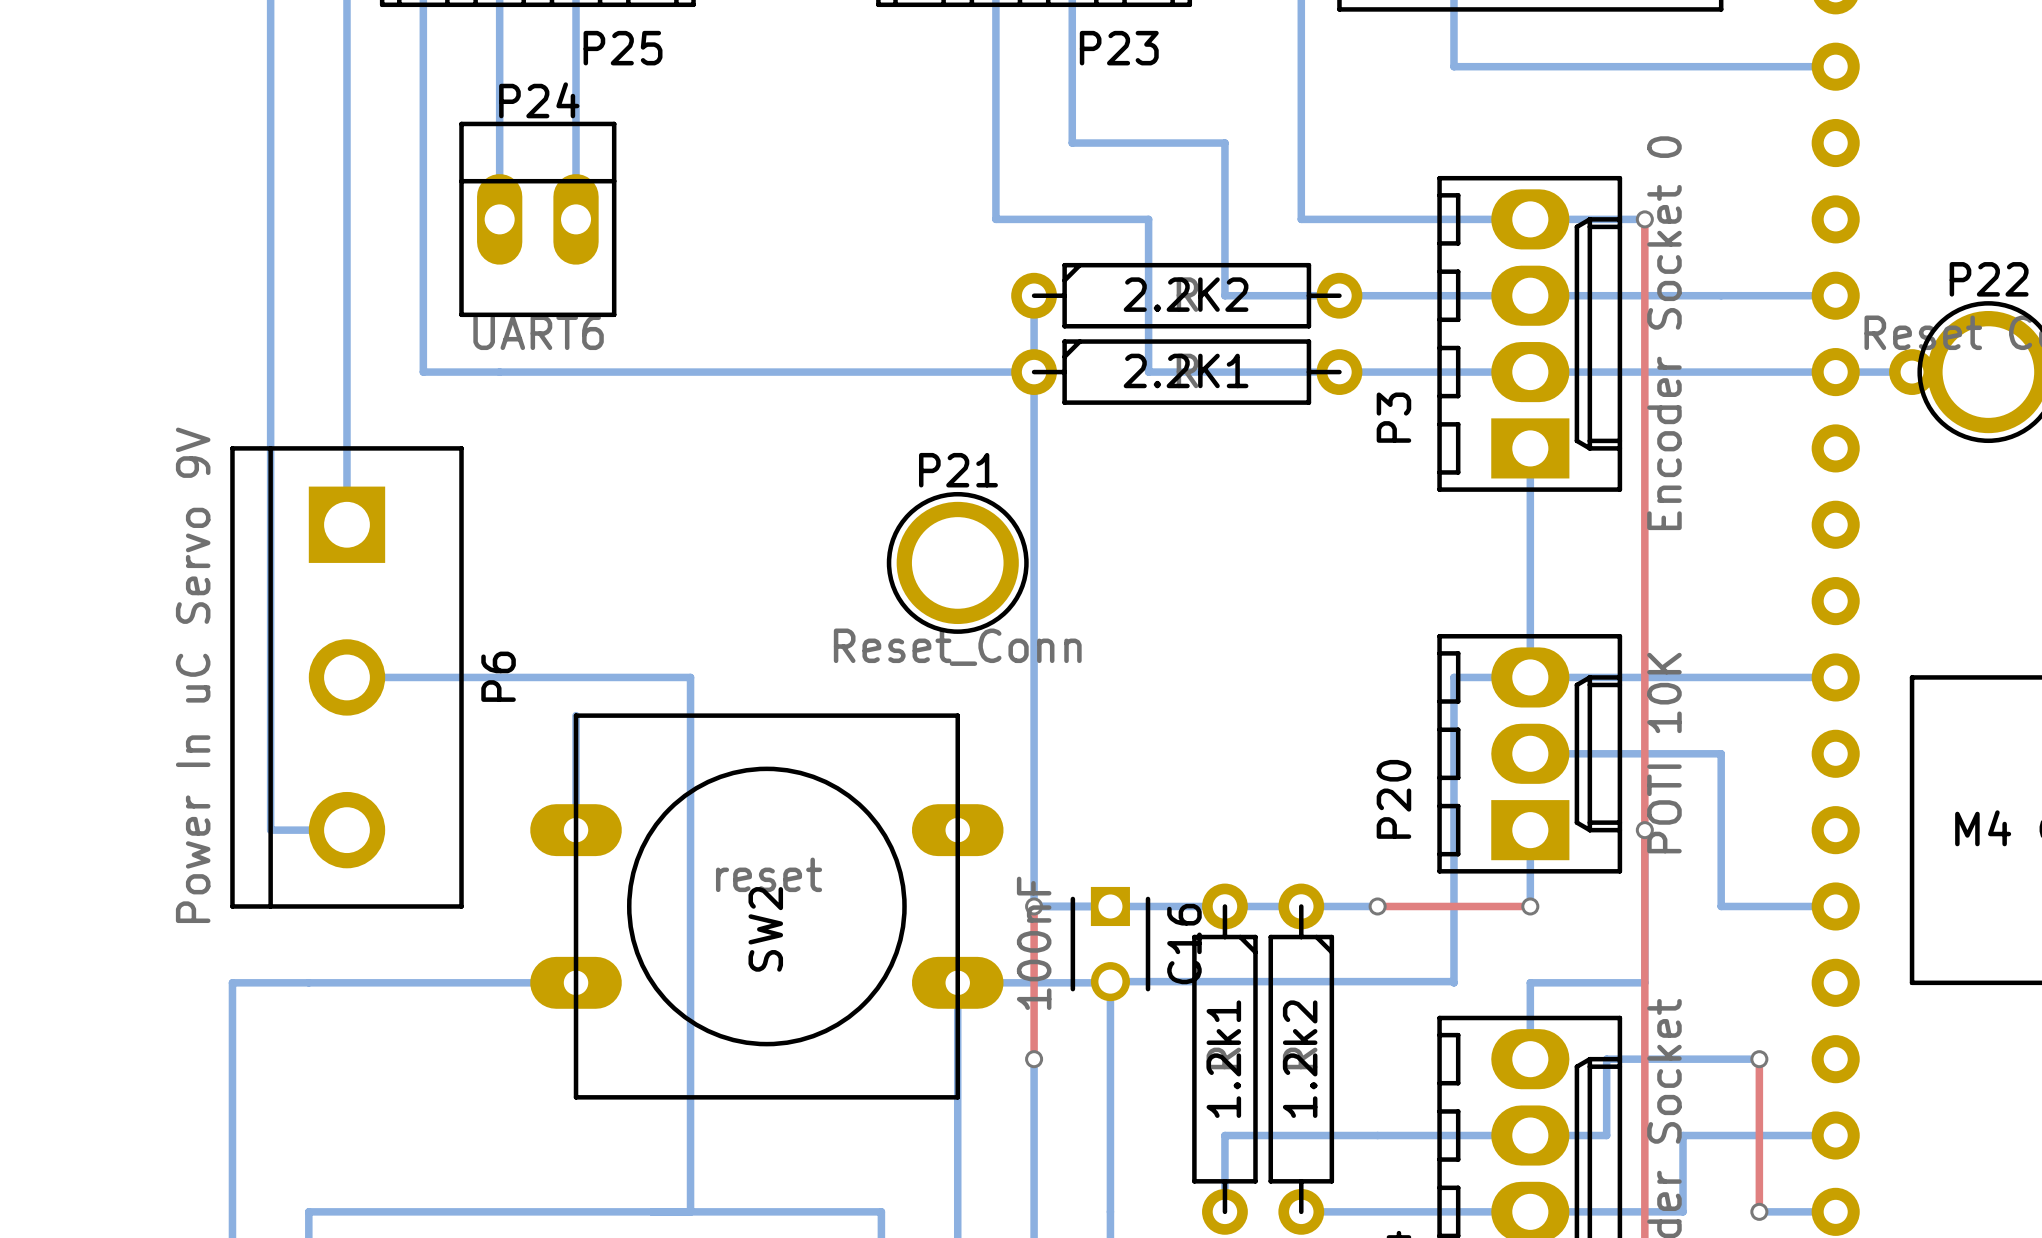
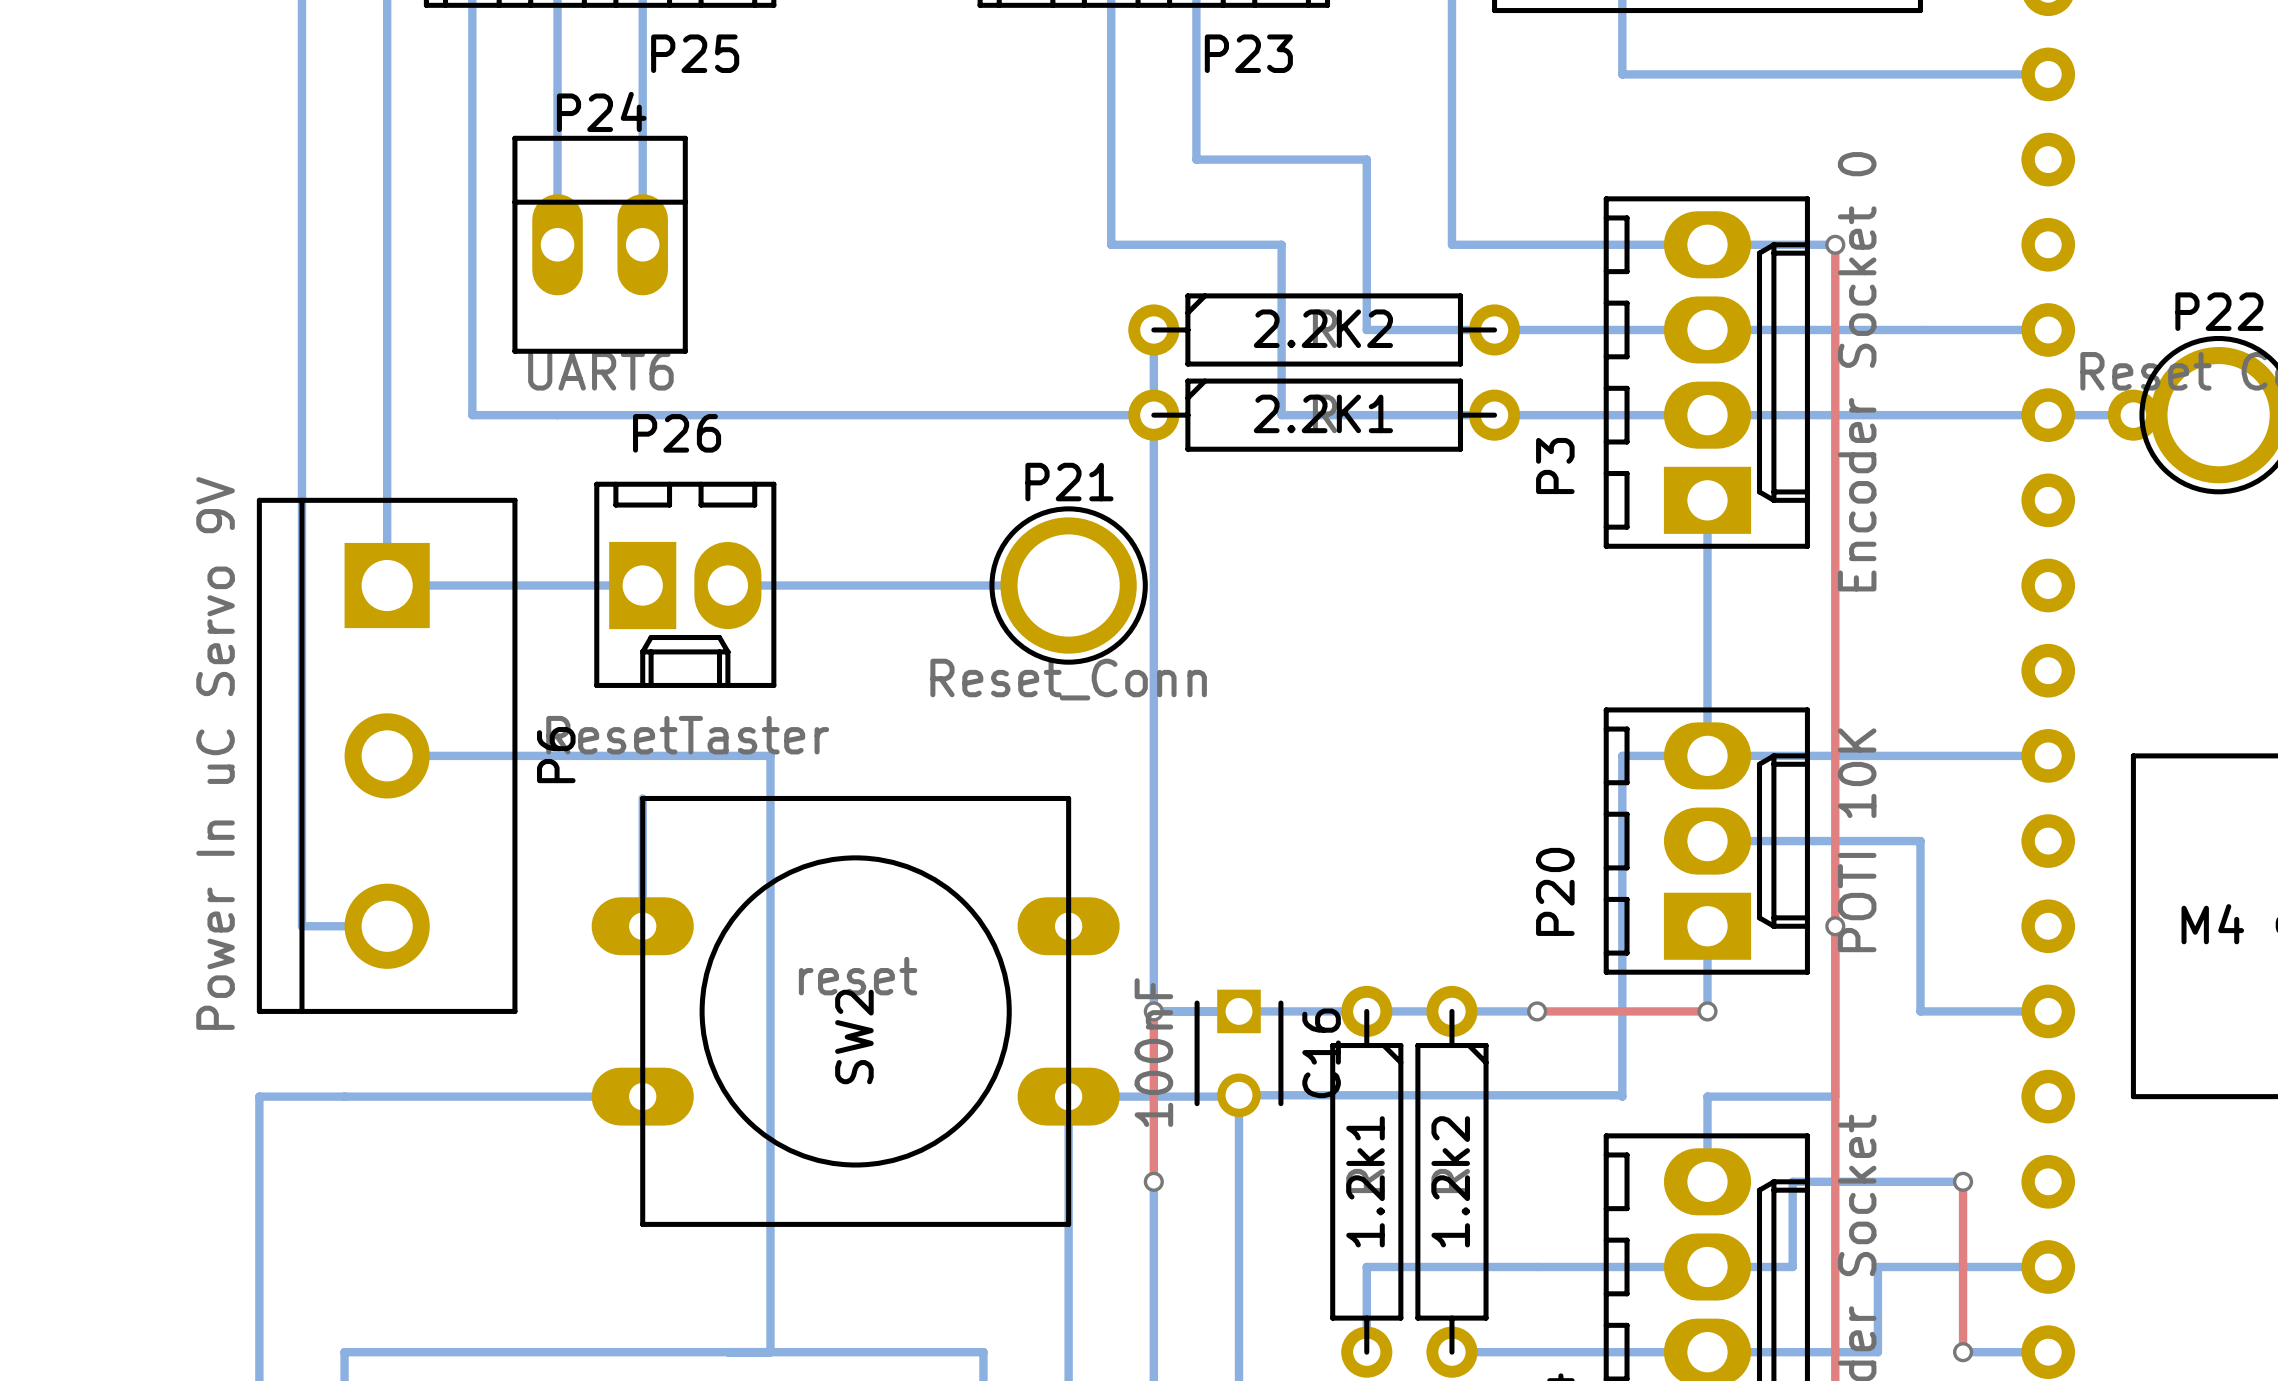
bottom track: none -> (387, 585) (642, 585)
P26: none -> ResetTaster (685, 584)
bottom track: none -> (727, 585) (1068, 585)
P21 position: (957, 562) -> (1068, 585)

